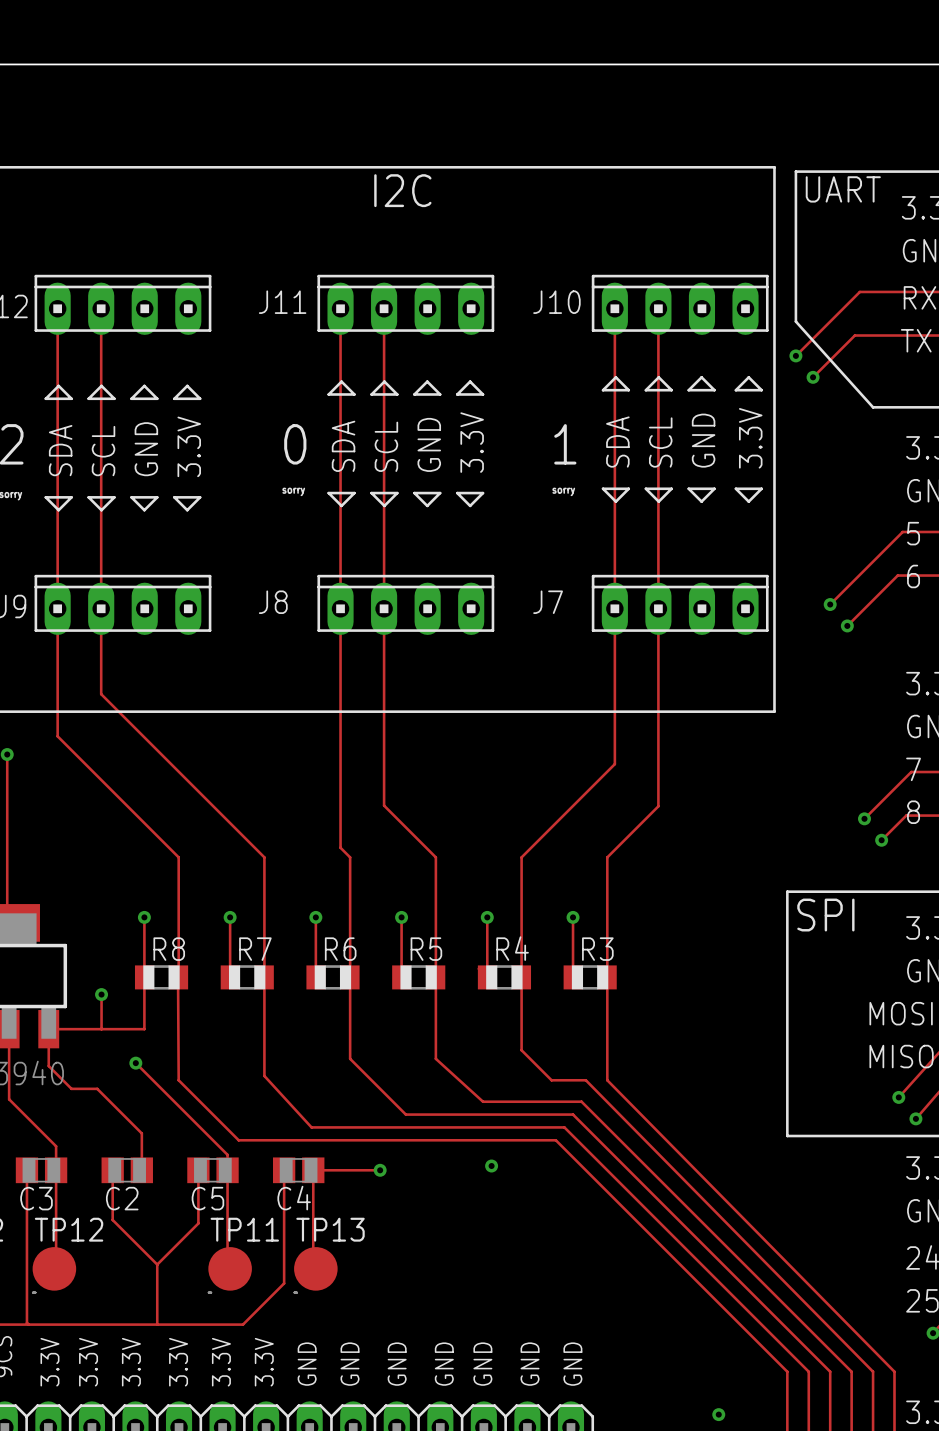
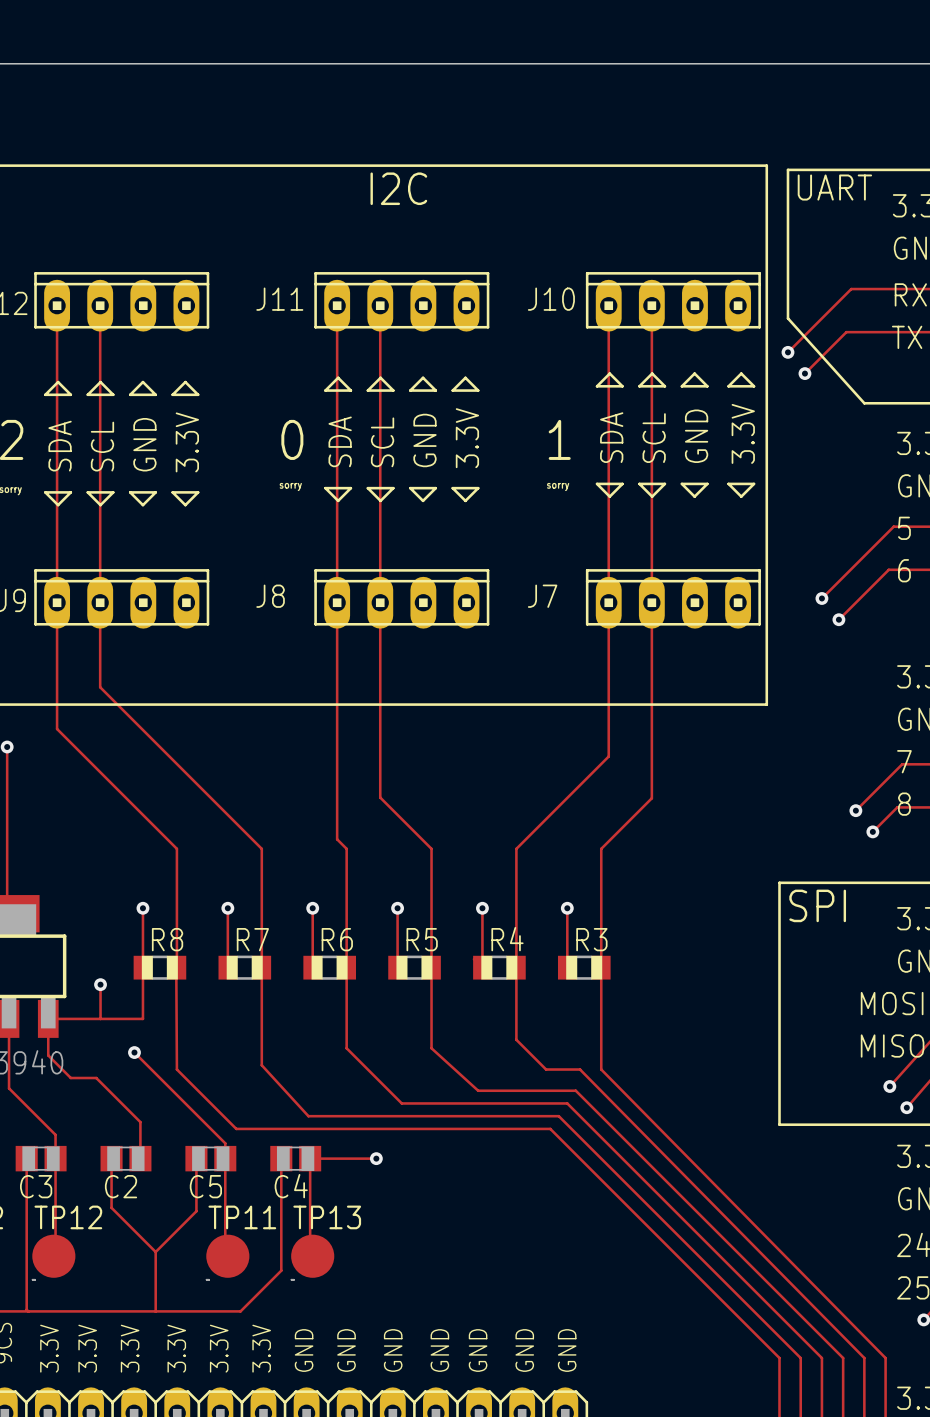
via: (491, 1166) -> none
via: (718, 1414) -> none

